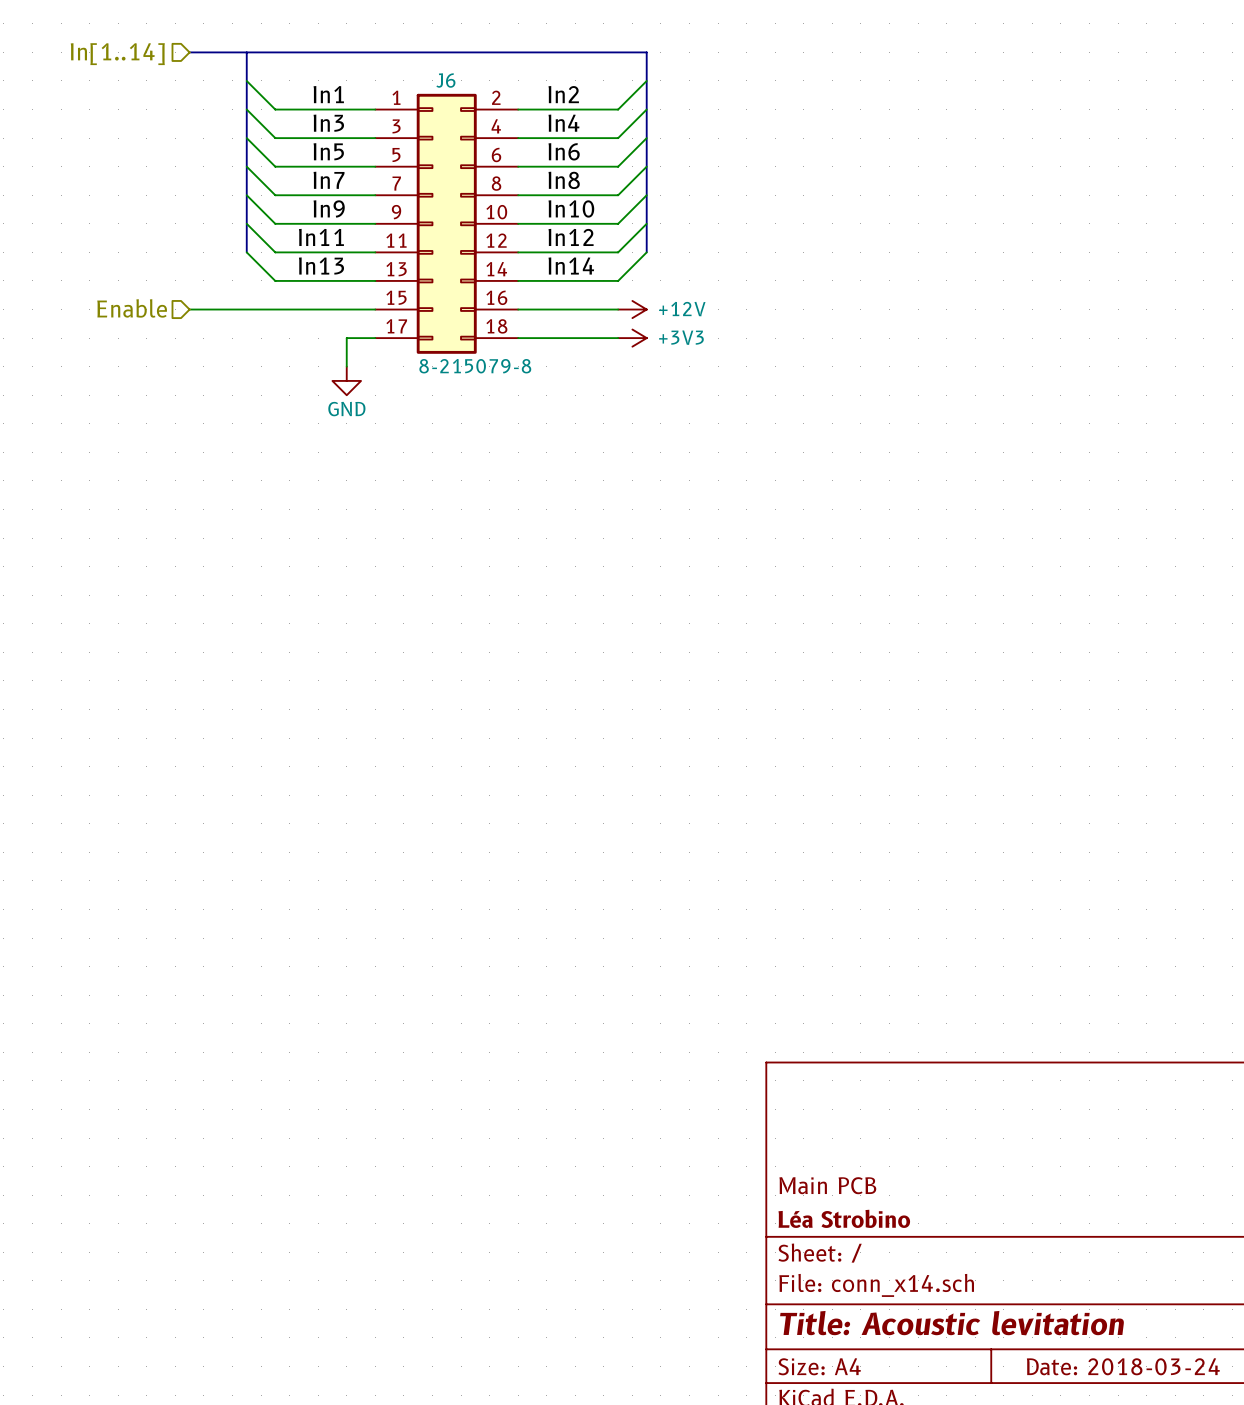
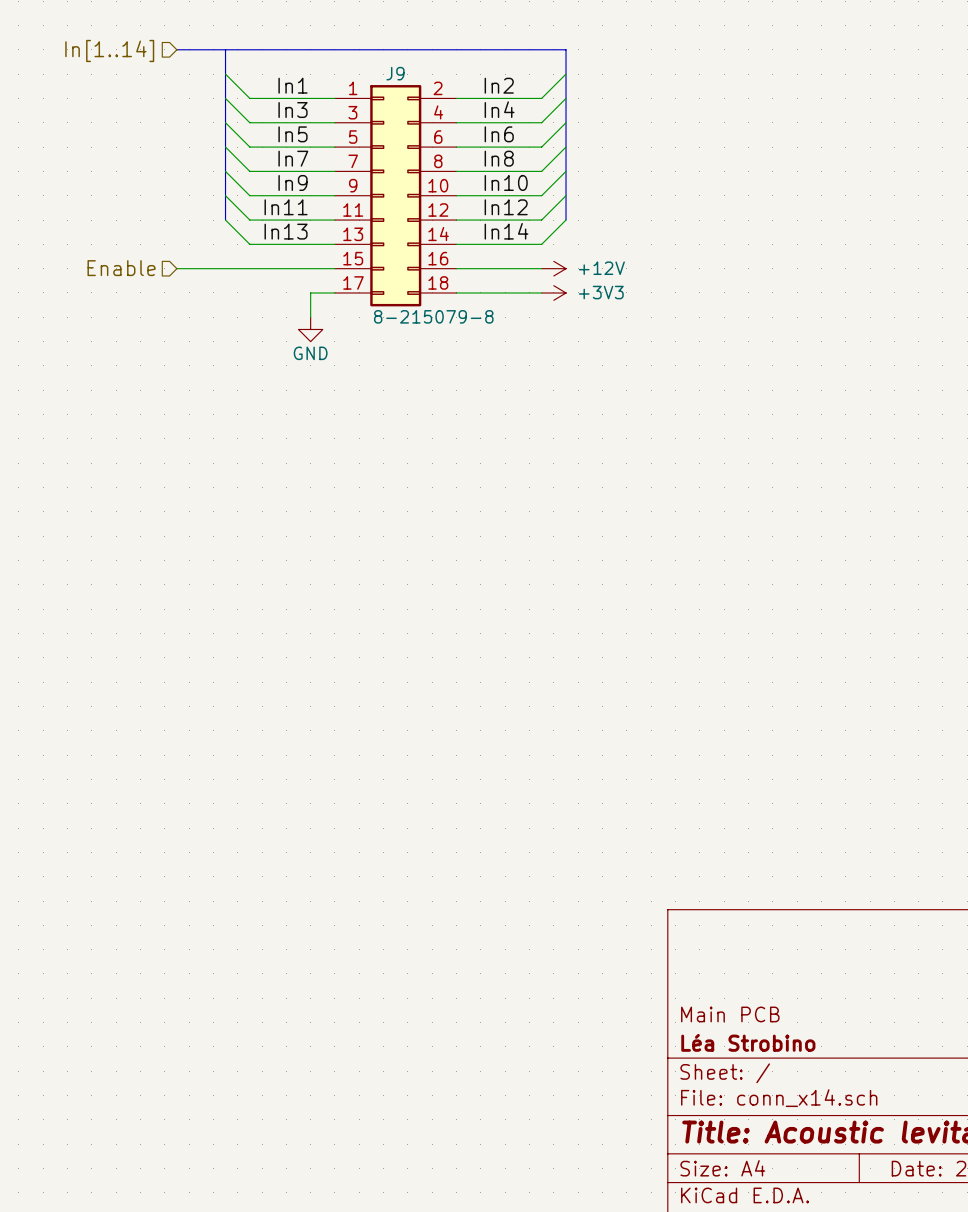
J6 name: J6 (445, 80) -> J9 (395, 73)

